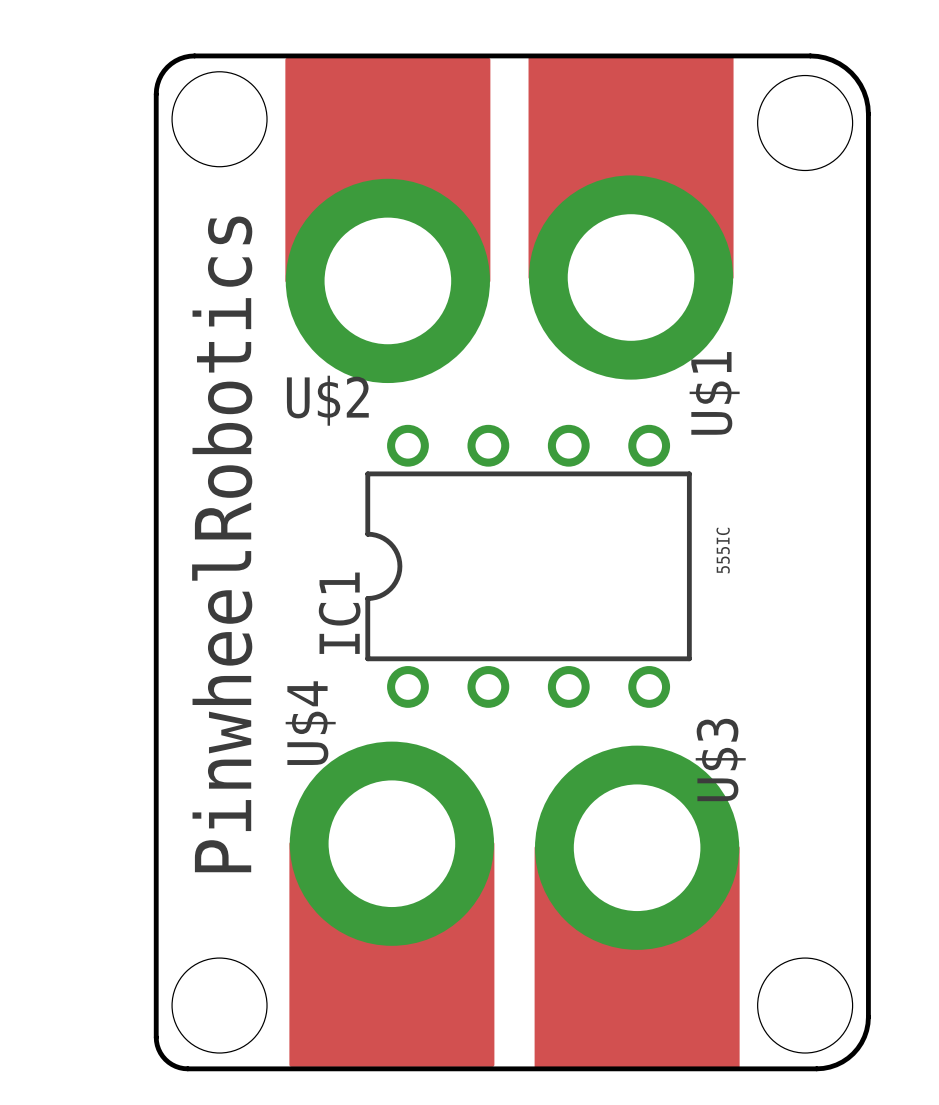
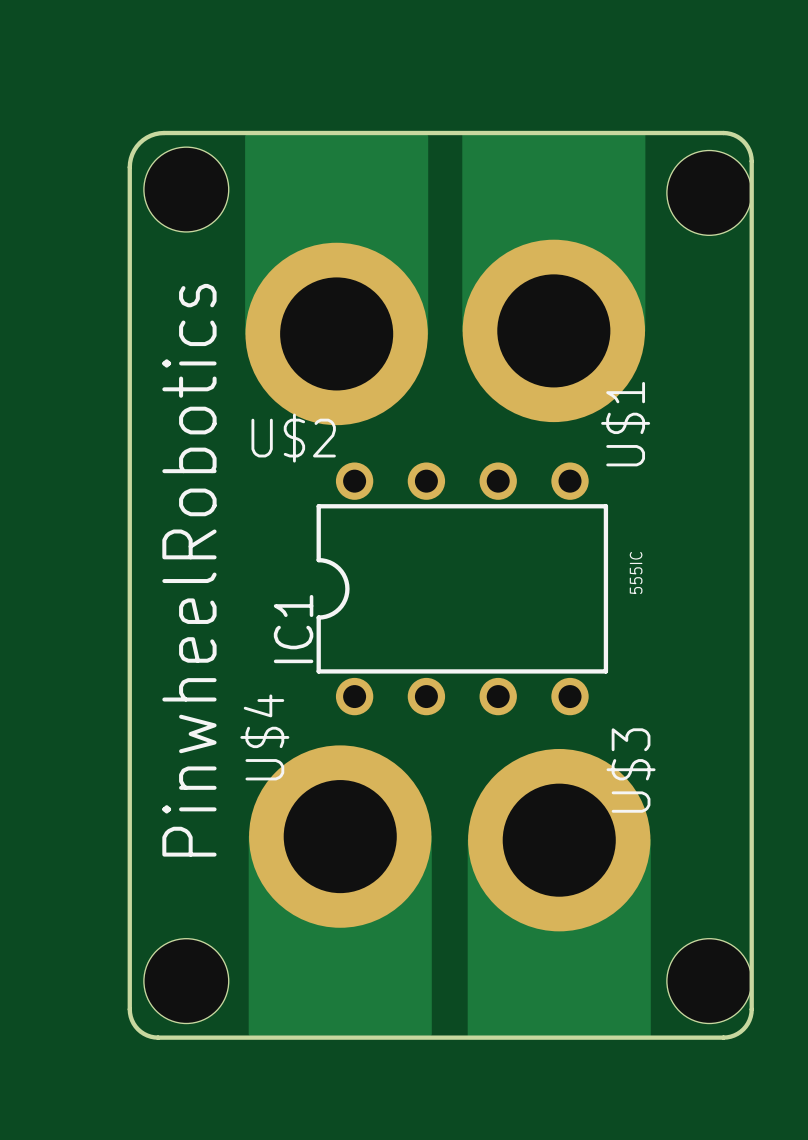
board edge: (810, 55) (832, 60) (851, 72) (864, 91) (868, 114) (868, 1017) (864, 1036) (853, 1053) (836, 1064) (816, 1068) -> (713, 133) (730, 133) (740, 138) (749, 150) (751, 161) (751, 1009) (749, 1020) (743, 1029) (734, 1035) (719, 1037)

